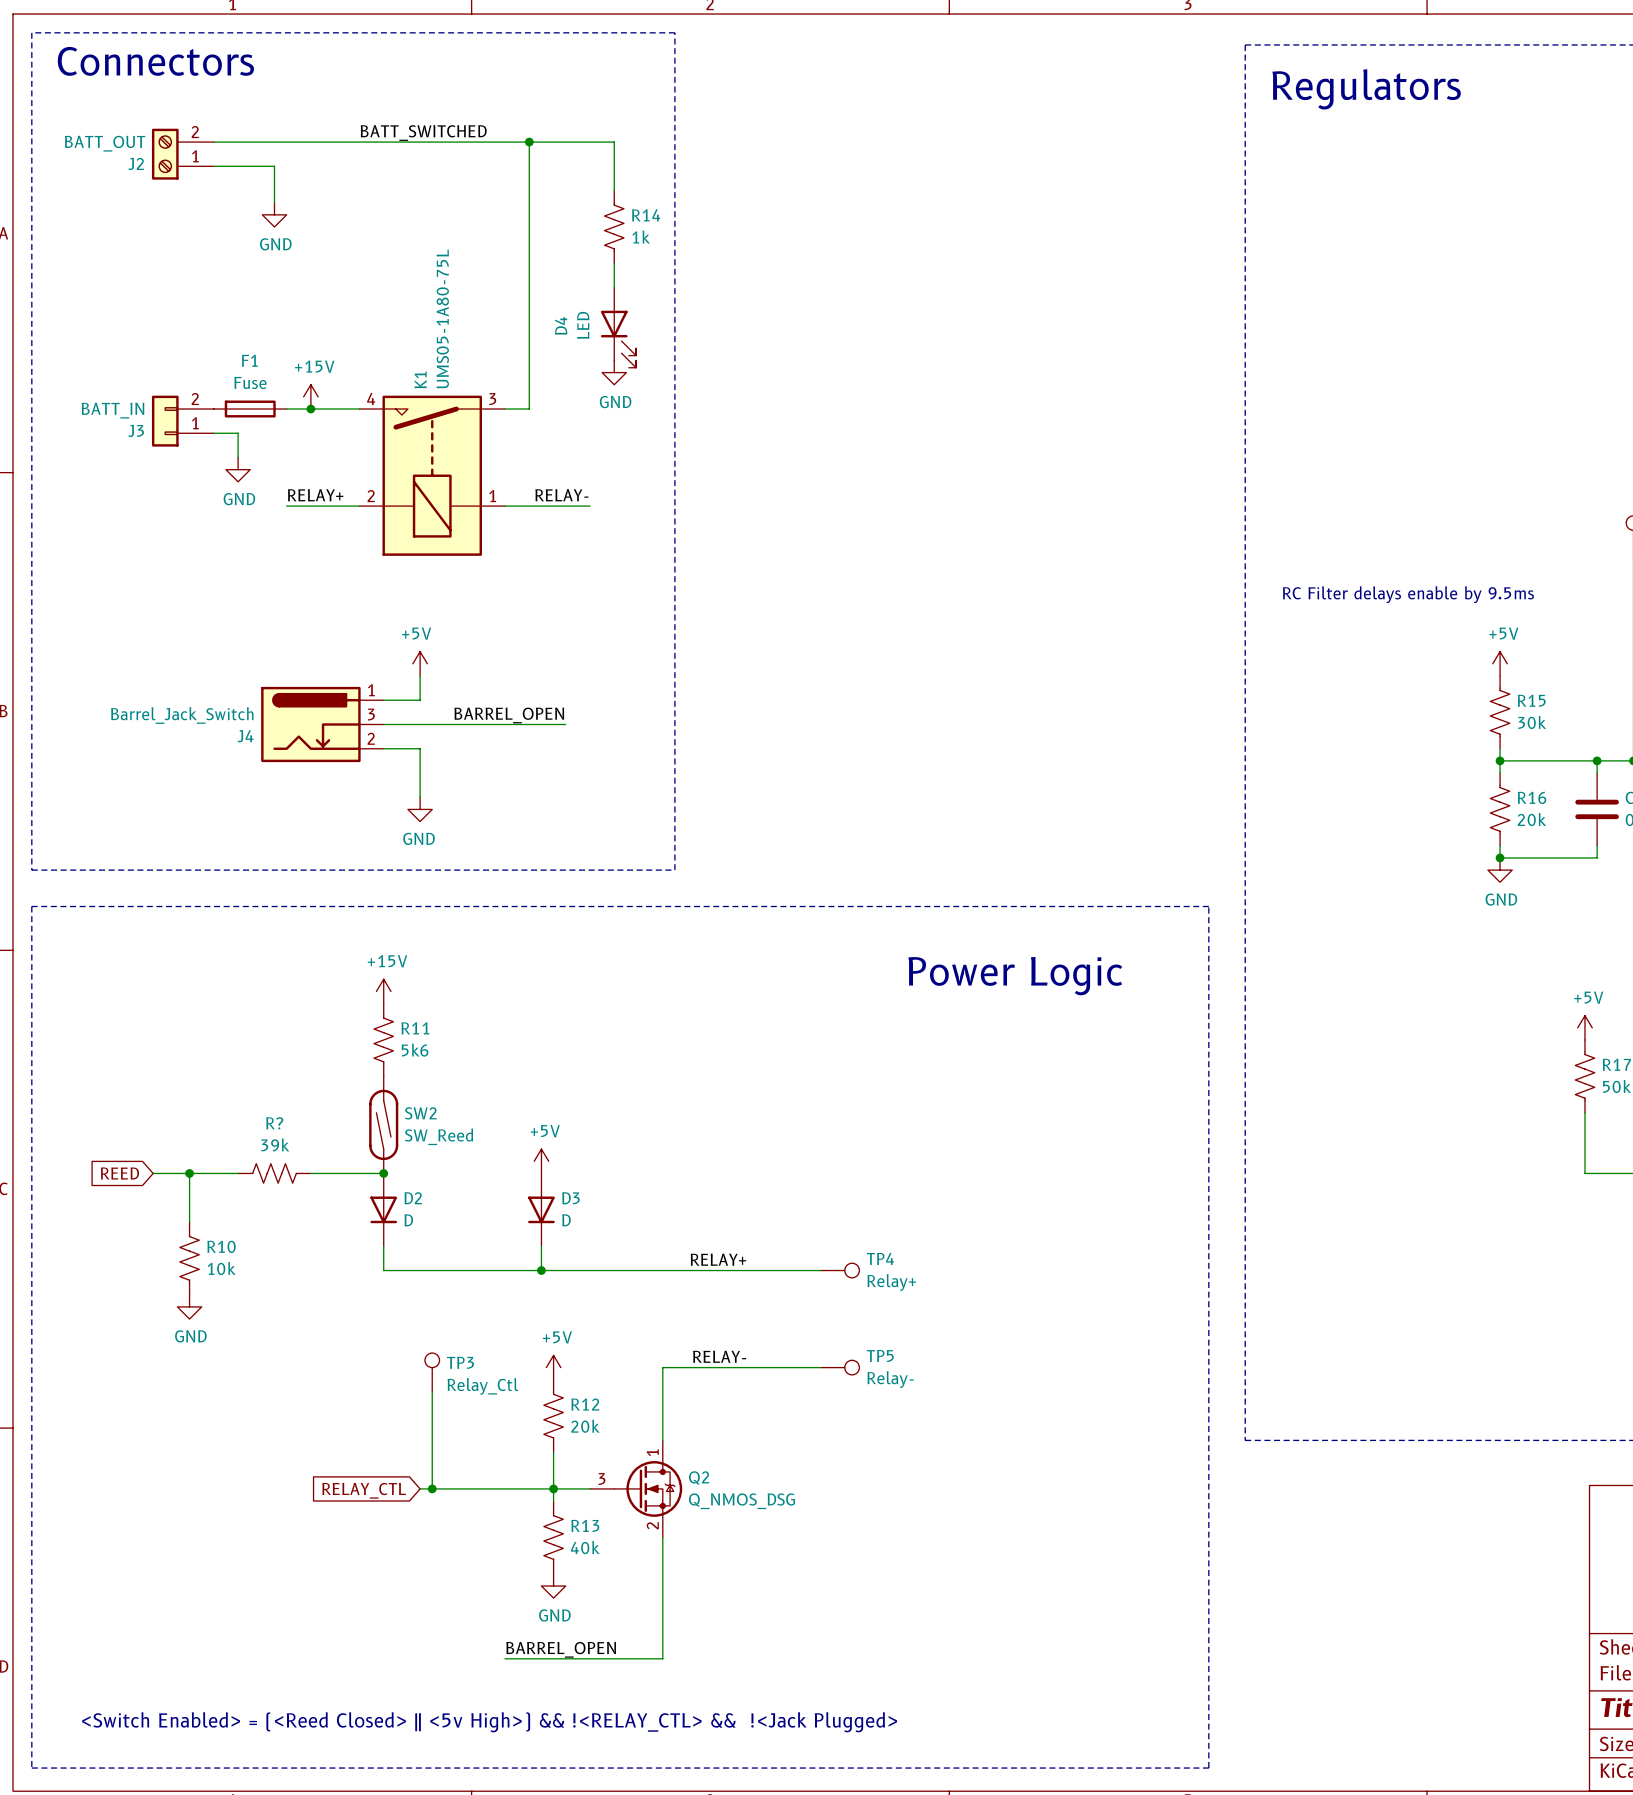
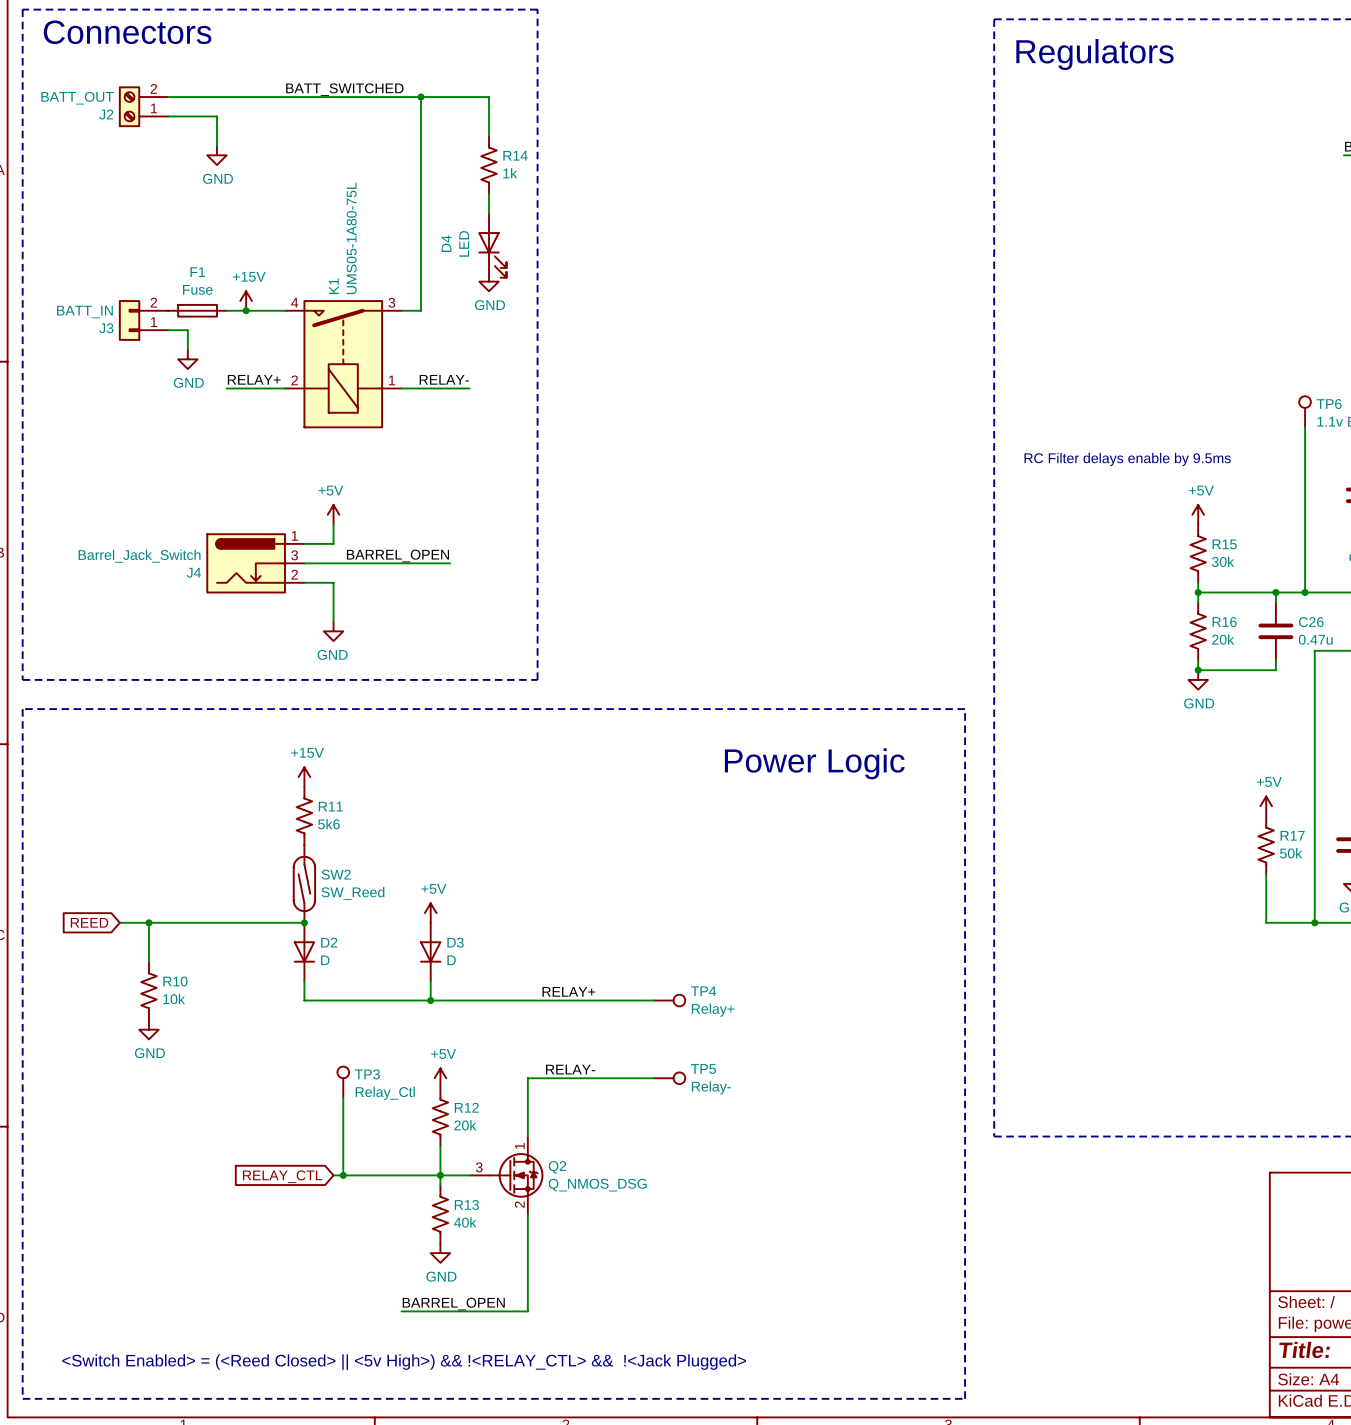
R?: 39k (274, 1173) -> none

